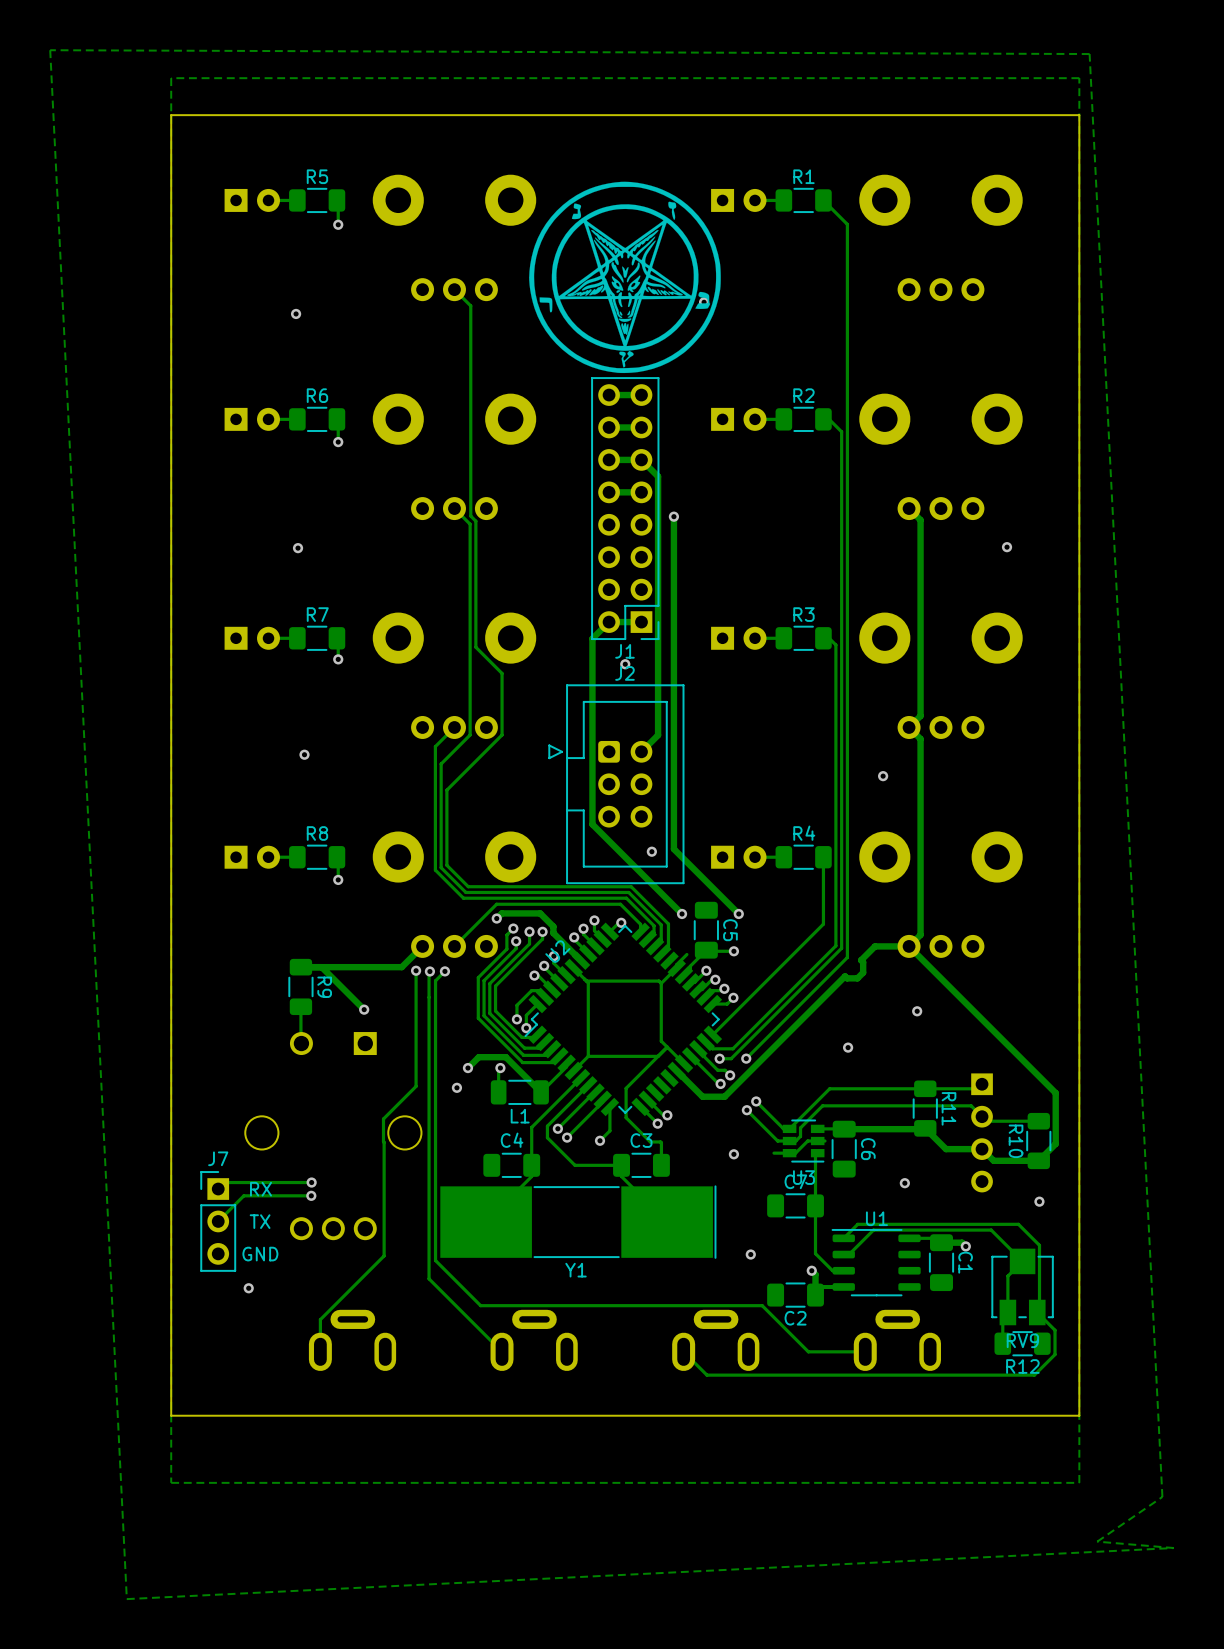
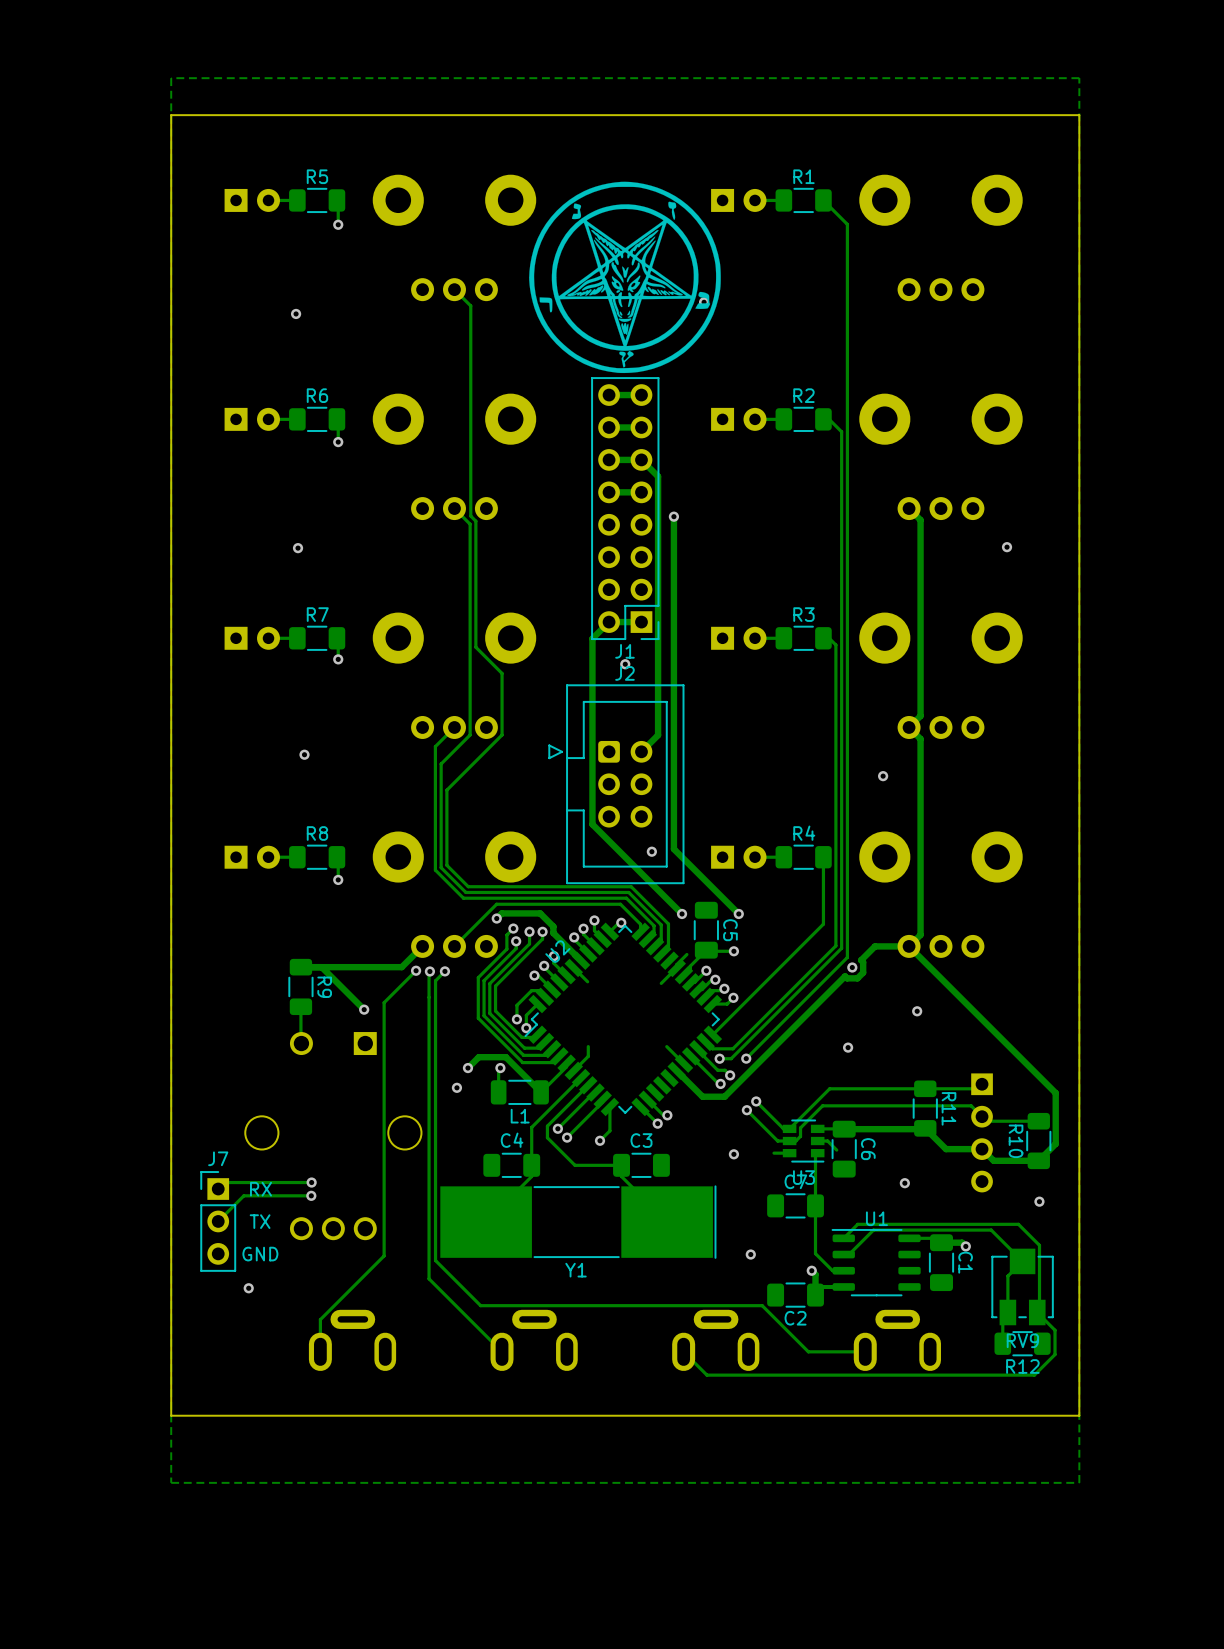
zone outline: (50, 50) (1089, 54) (1162, 1496) (1097, 1541) (1173, 1548) (126, 1599) (50, 50) -> none
via: none -> (852, 967)
track: (573, 968) (588, 982) (588, 1046) -> (573, 967) (587, 981)
track: (416, 970) (416, 1086) (383, 1118) (384, 1142) -> (416, 970) (384, 1002) (384, 1142)
track: (586, 981) (658, 981) (661, 983) (661, 1041) (666, 1046) -> none
track: (667, 1047) (626, 1088) (626, 1117) (650, 1141) (661, 1142) (661, 1165) -> none
track: (658, 1056) (588, 1056) -> none
track: (817, 1141) (807, 1141) (795, 1153) (789, 1153) -> none
track: none -> (824, 1141) (827, 1141) (836, 1150)

